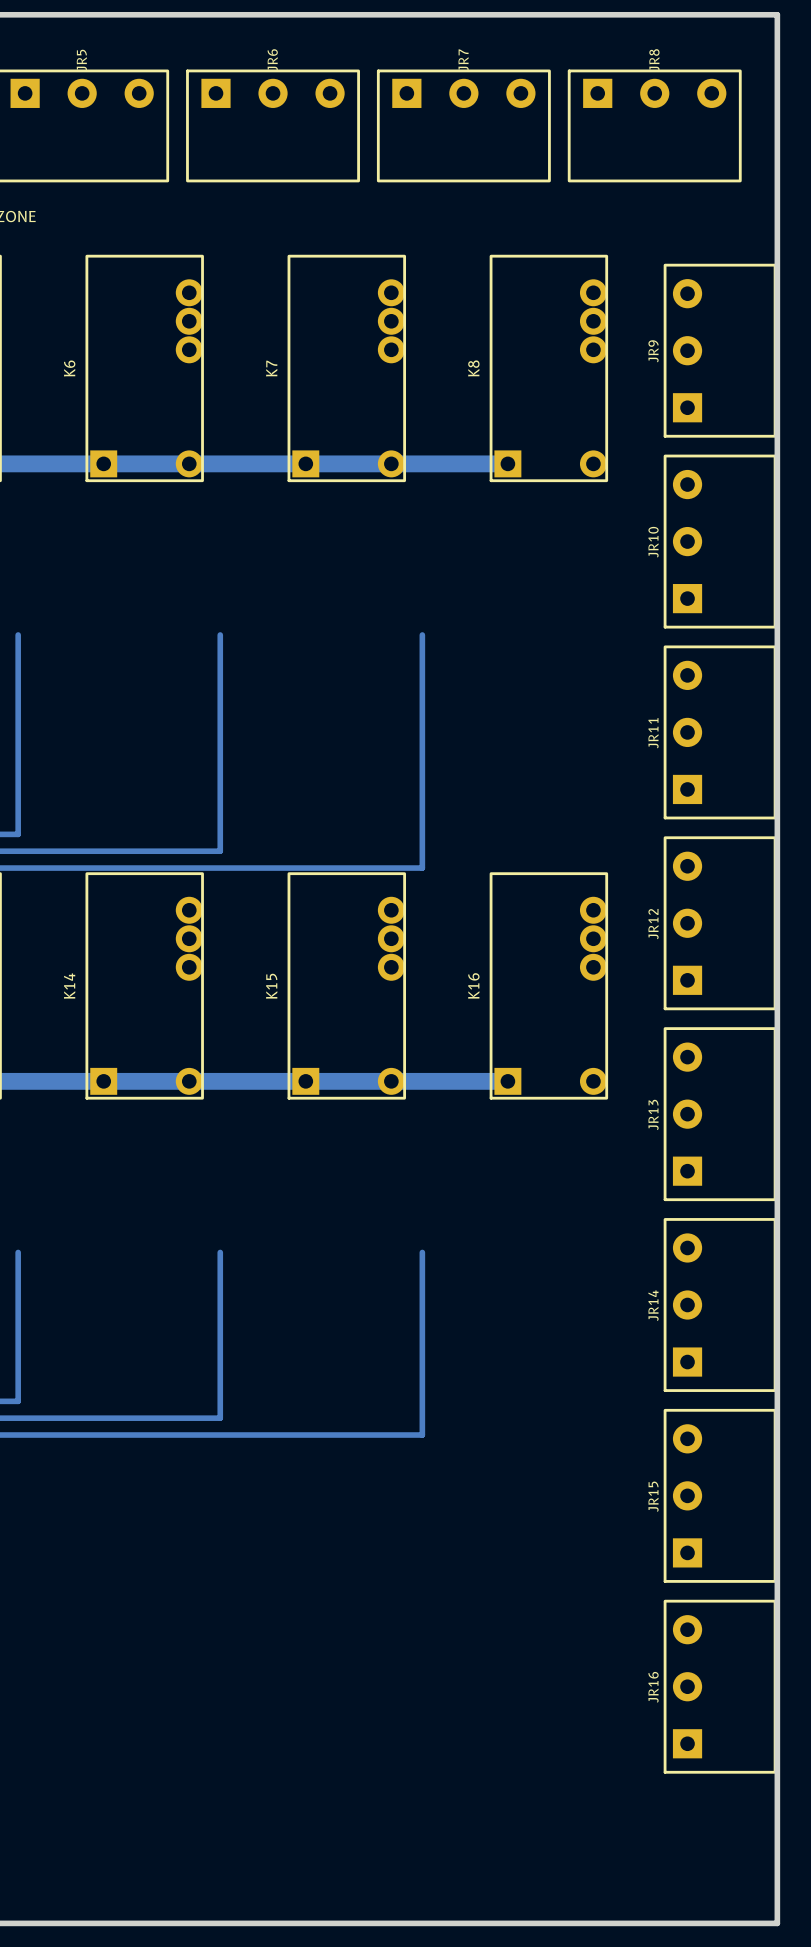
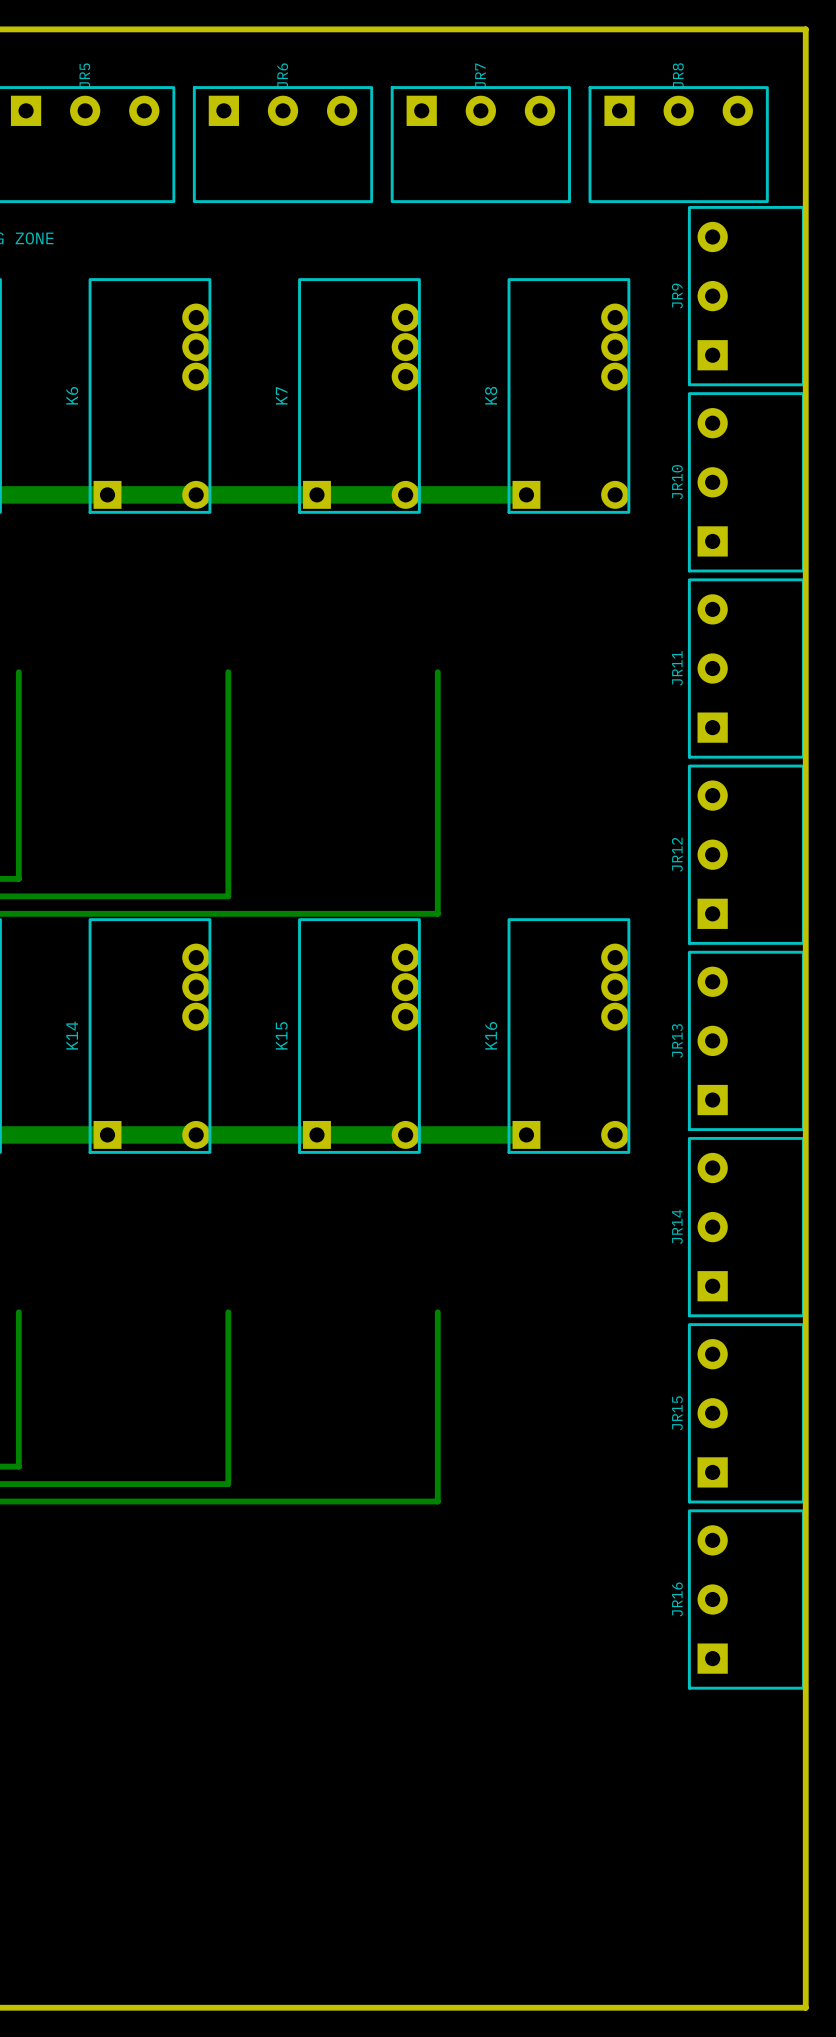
JR9 position: (720, 350) -> (746, 296)
JR10 position: (720, 541) -> (746, 482)
JR11 position: (720, 732) -> (746, 668)
JR12 position: (720, 923) -> (746, 854)
JR13 position: (720, 1114) -> (746, 1040)
JR14 position: (720, 1305) -> (746, 1227)
JR15 position: (720, 1495) -> (746, 1413)
JR16 position: (720, 1686) -> (746, 1599)

